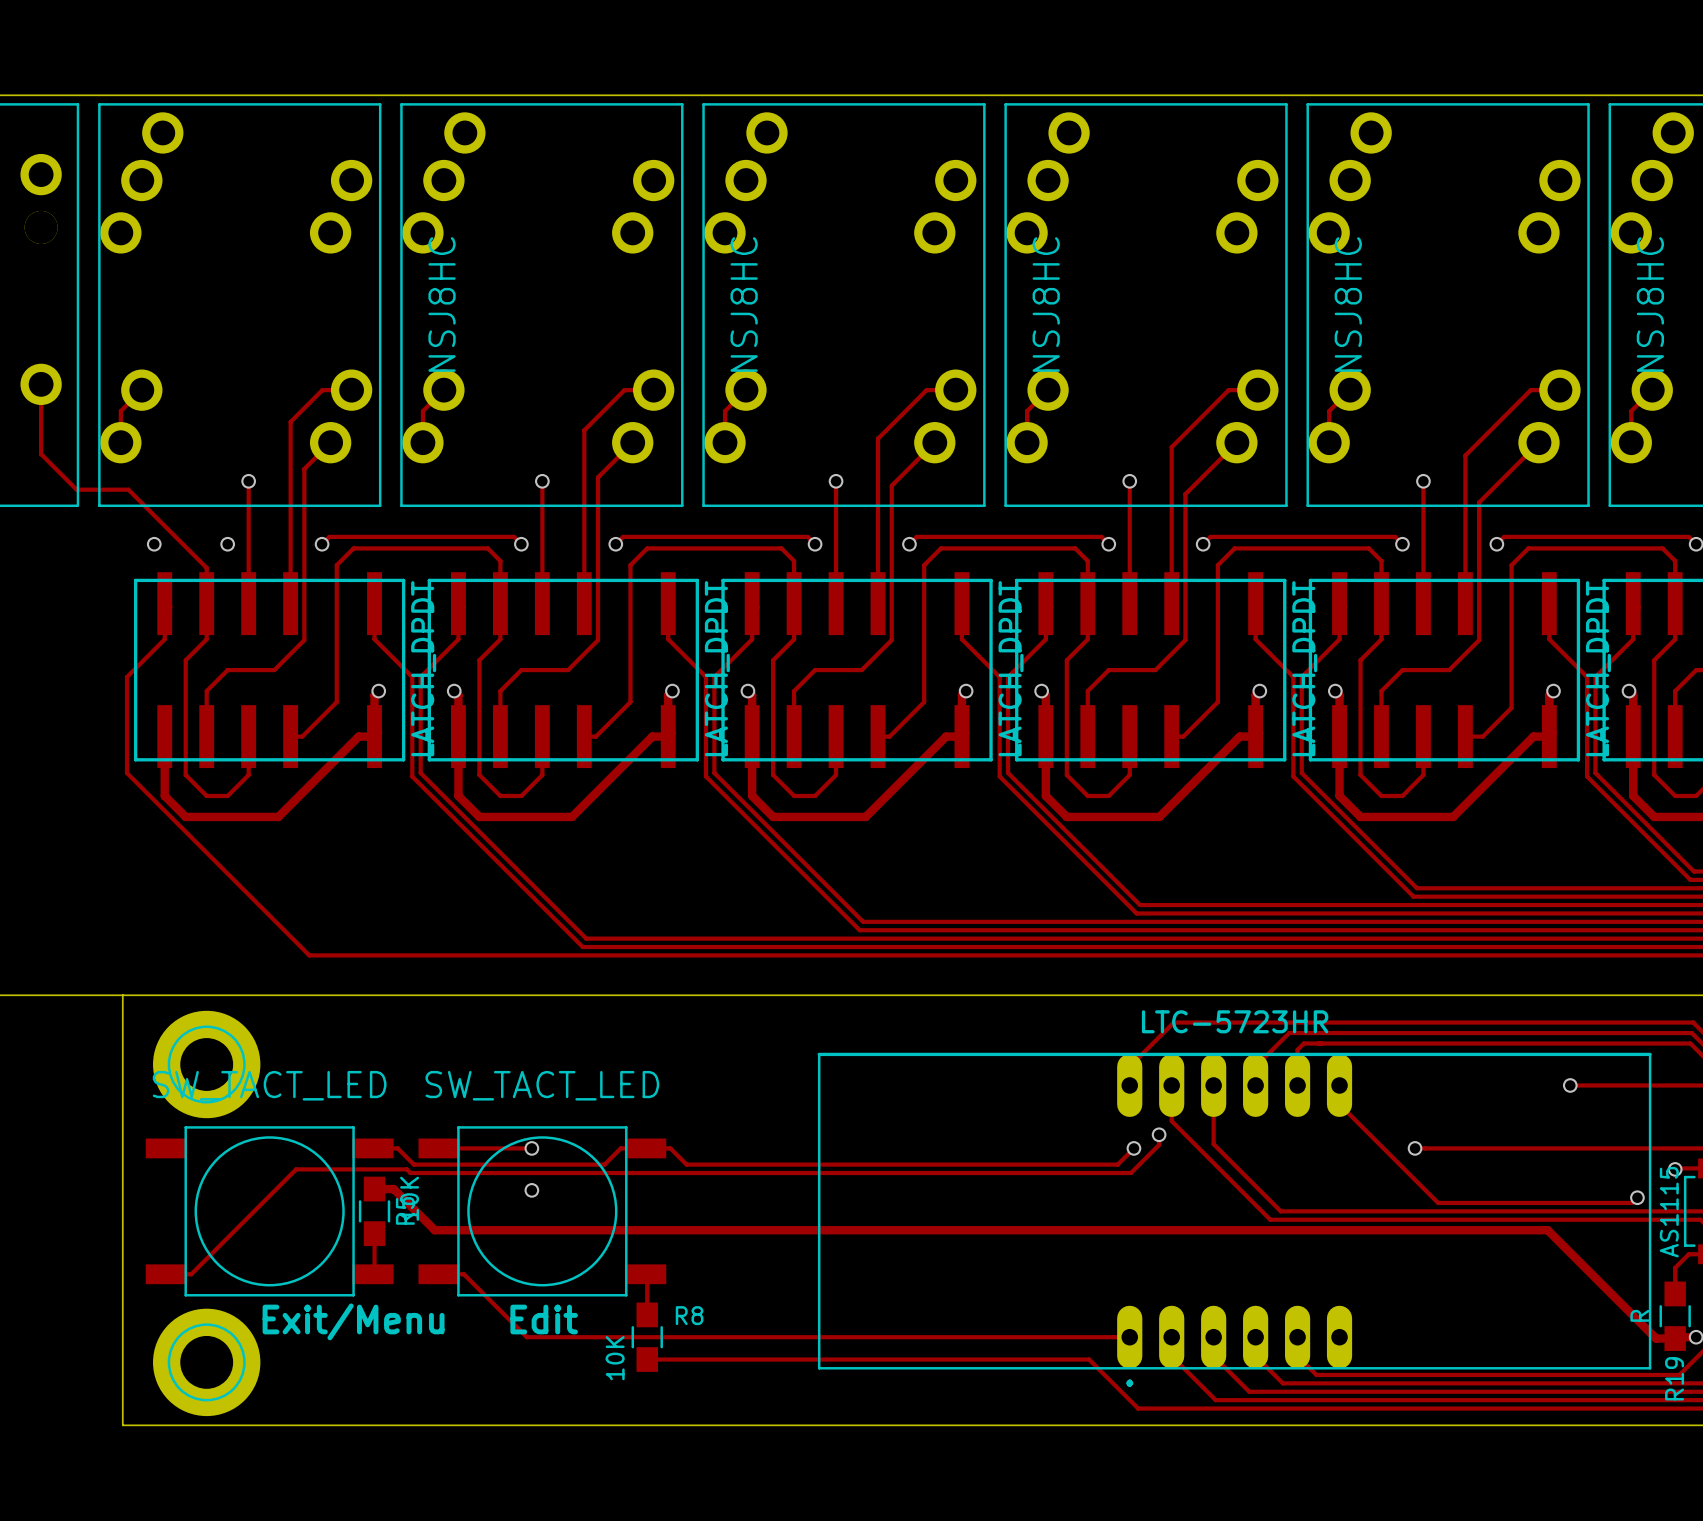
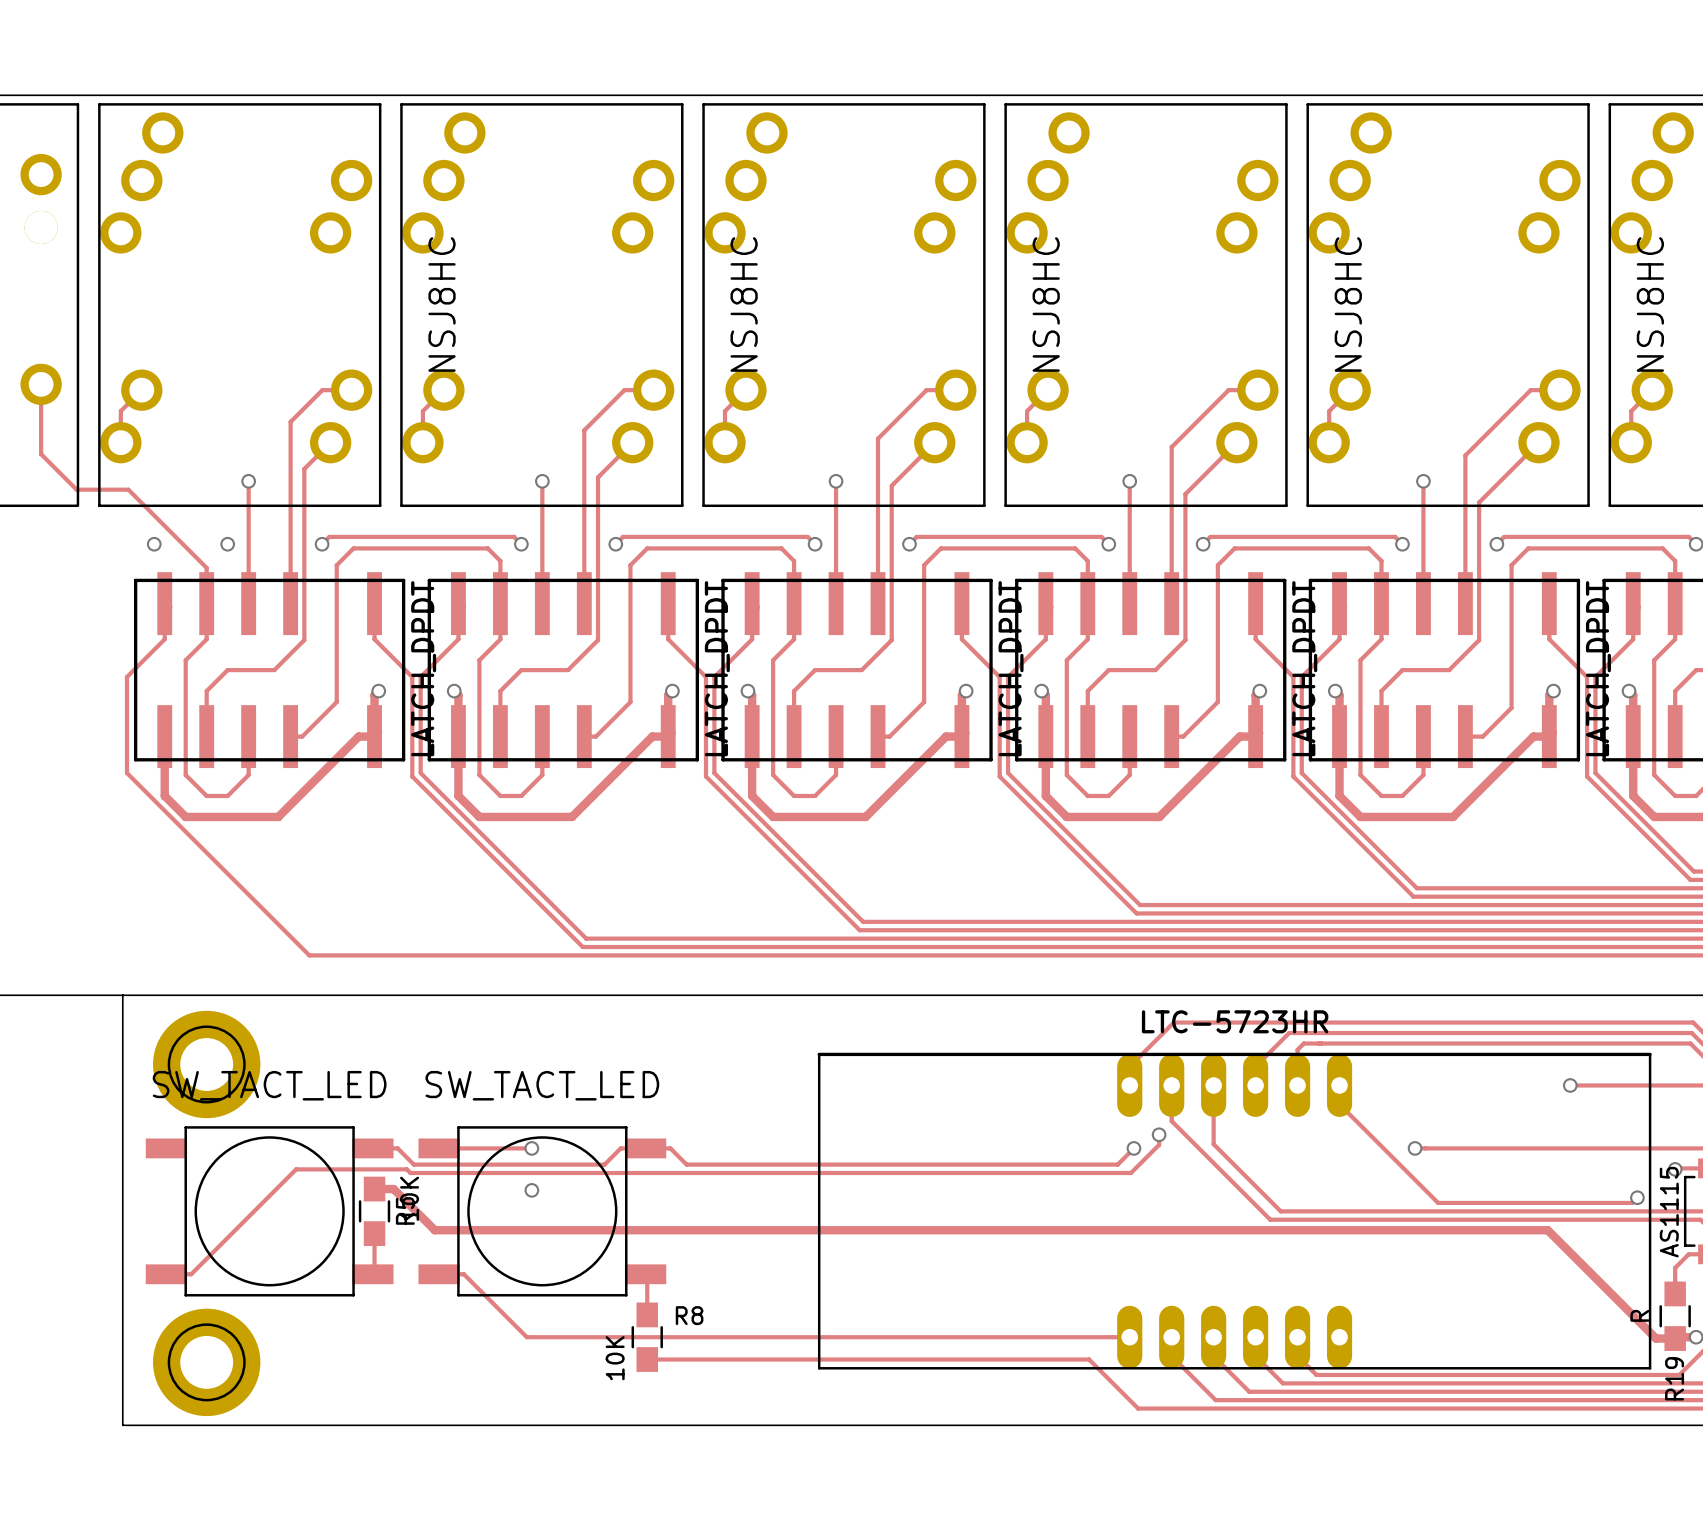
text: Edit (544, 1319) -> none
text: Exit/Menu (353, 1321) -> none
text: . (1129, 1383) -> none

